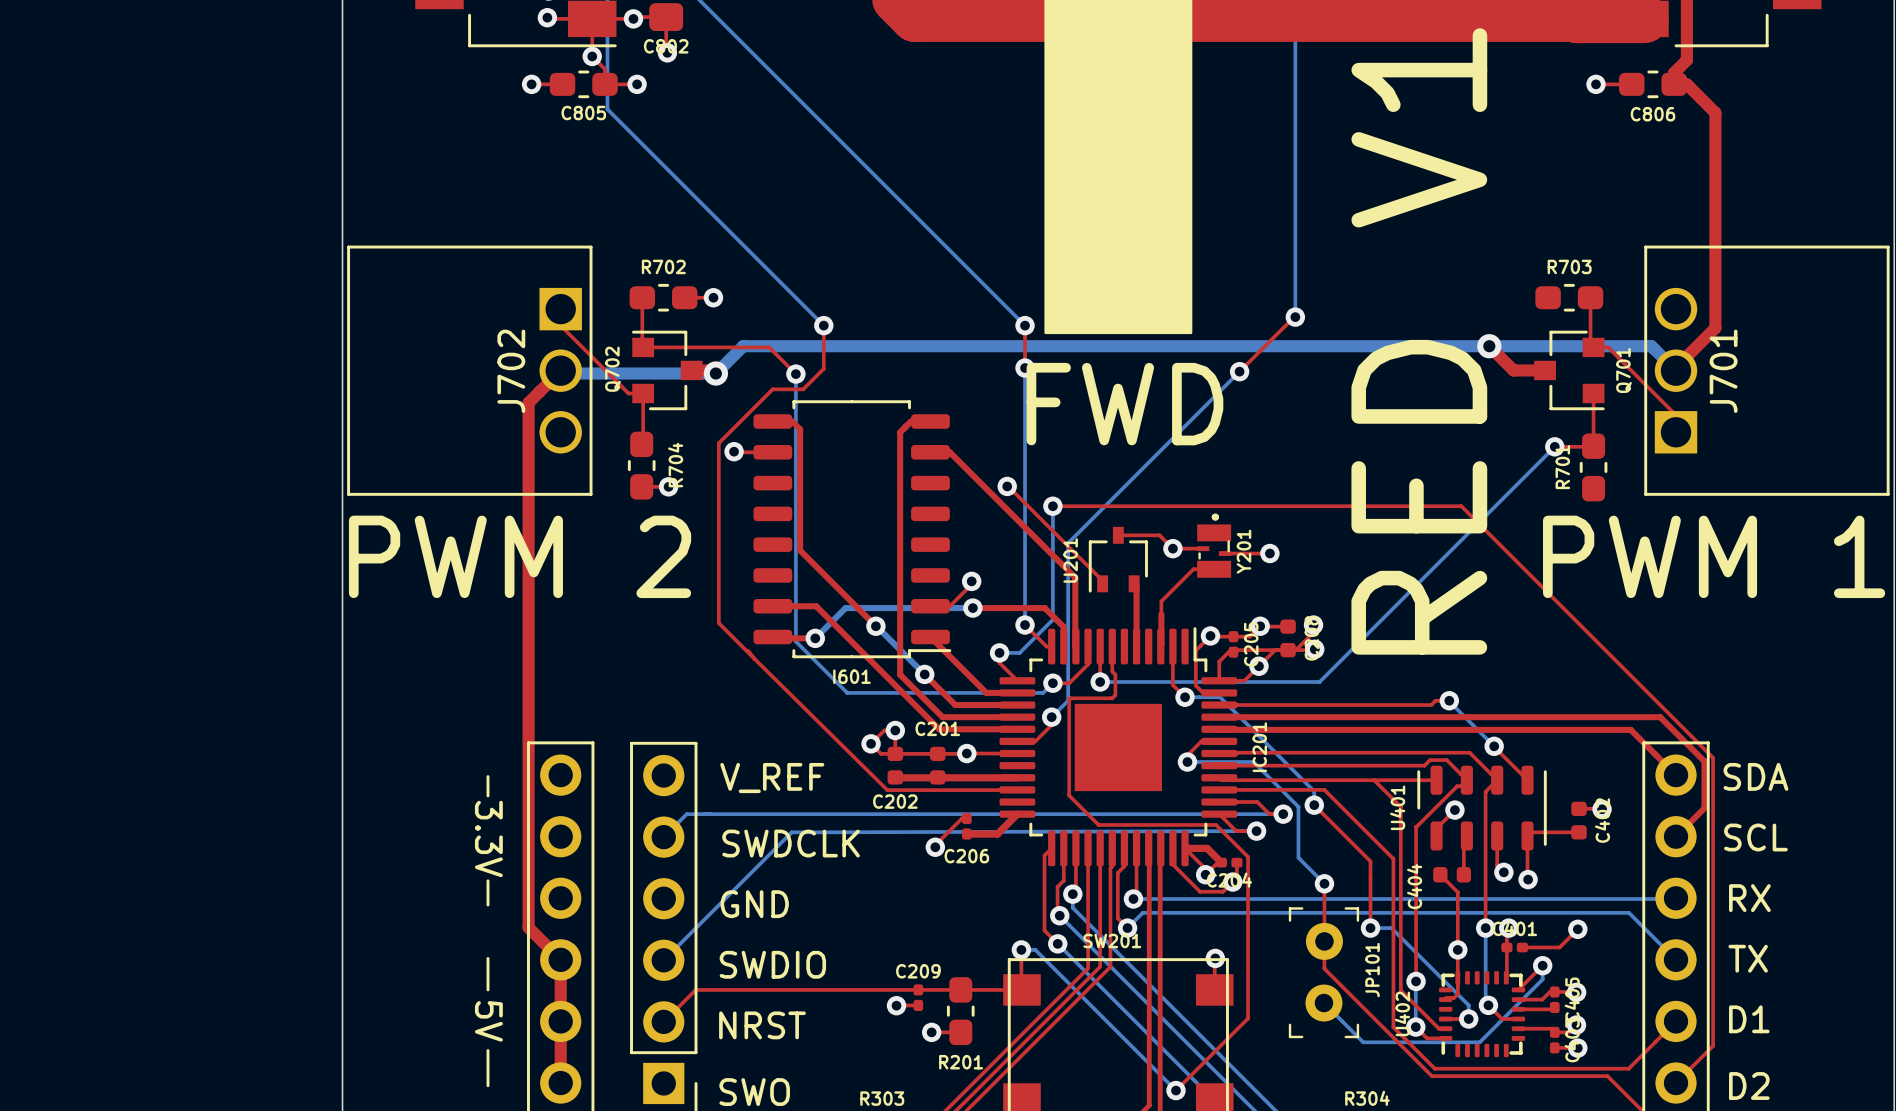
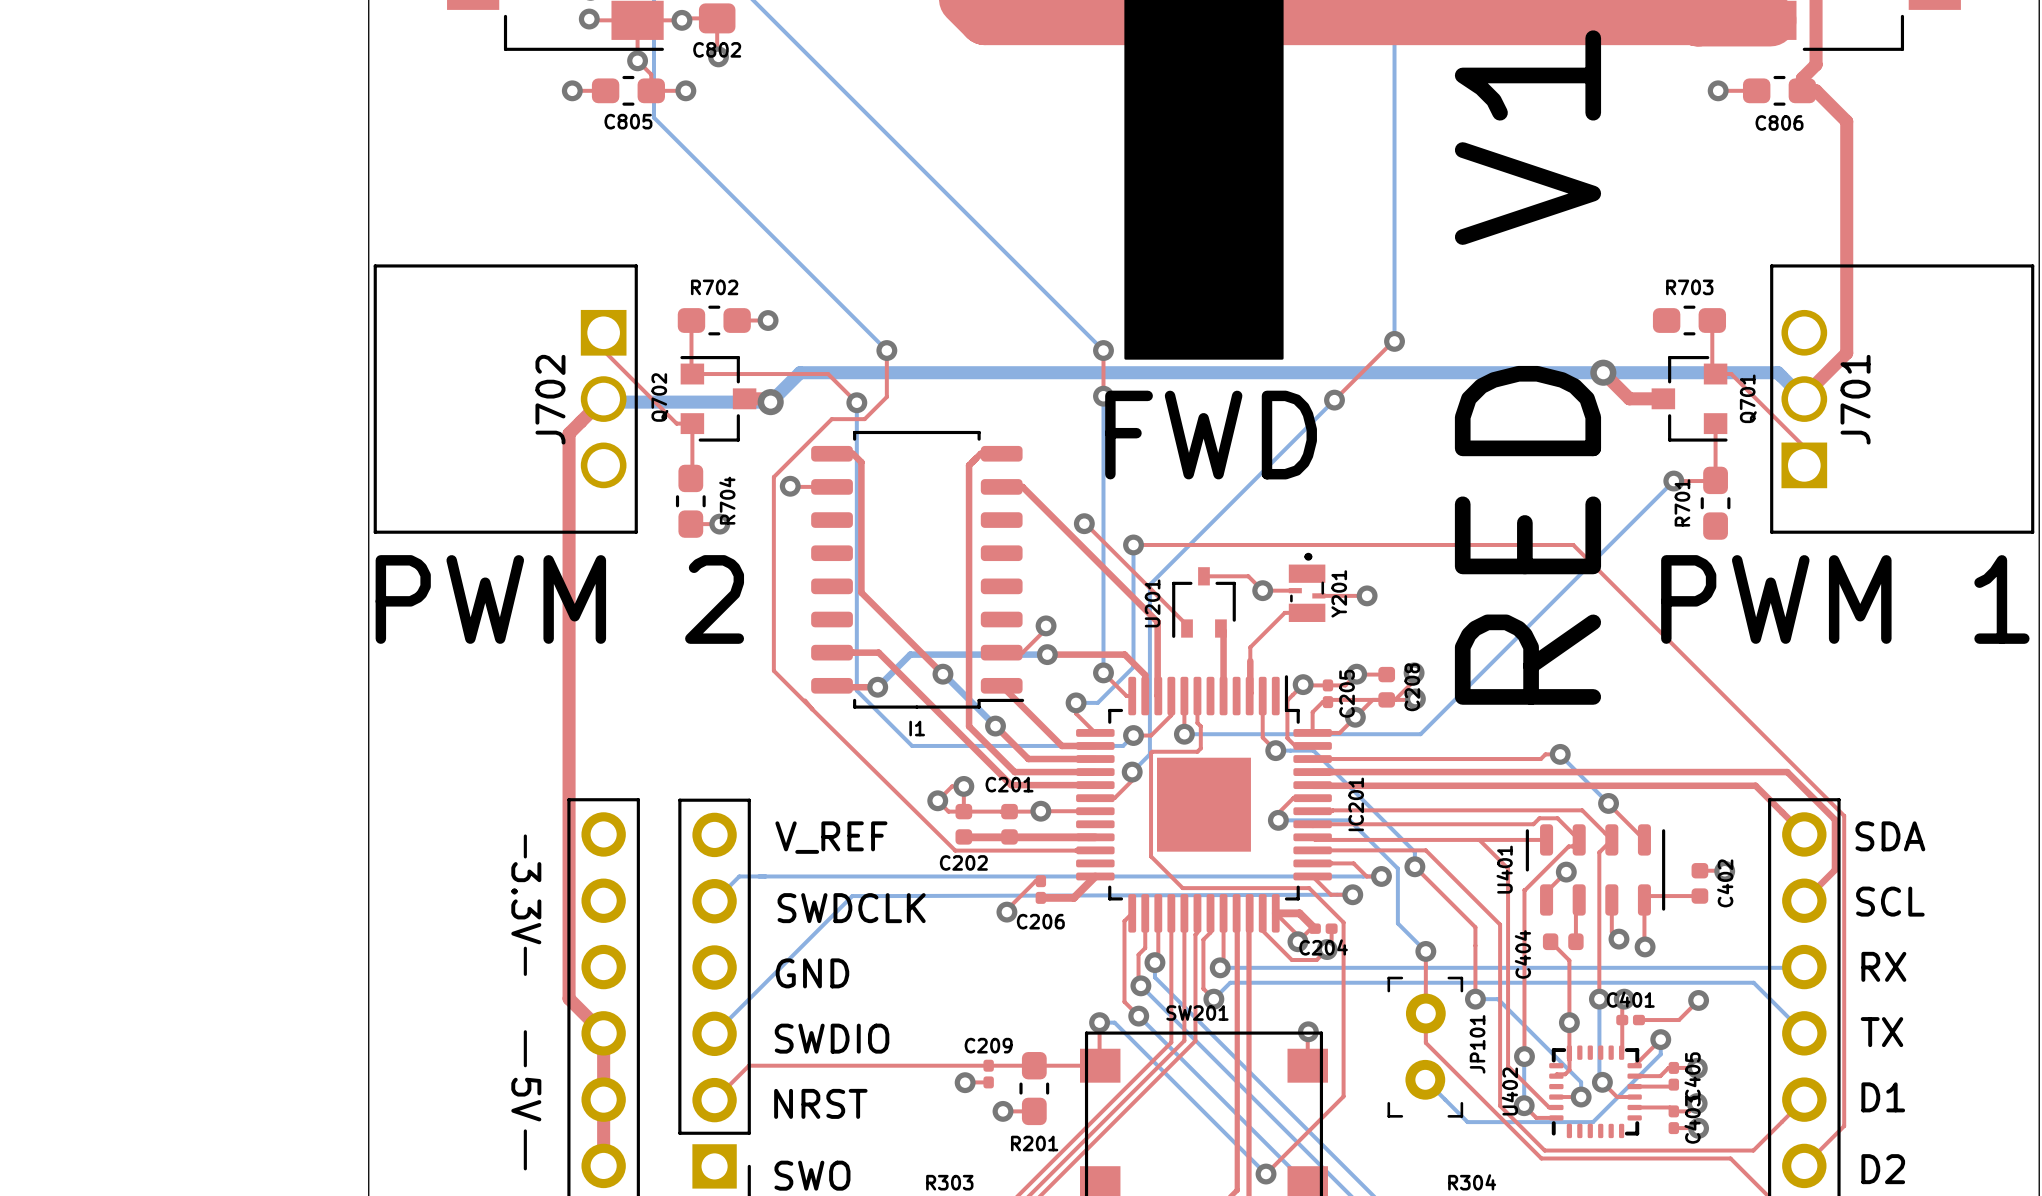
I601 name: I601 (851, 676) -> I1 (917, 728)

